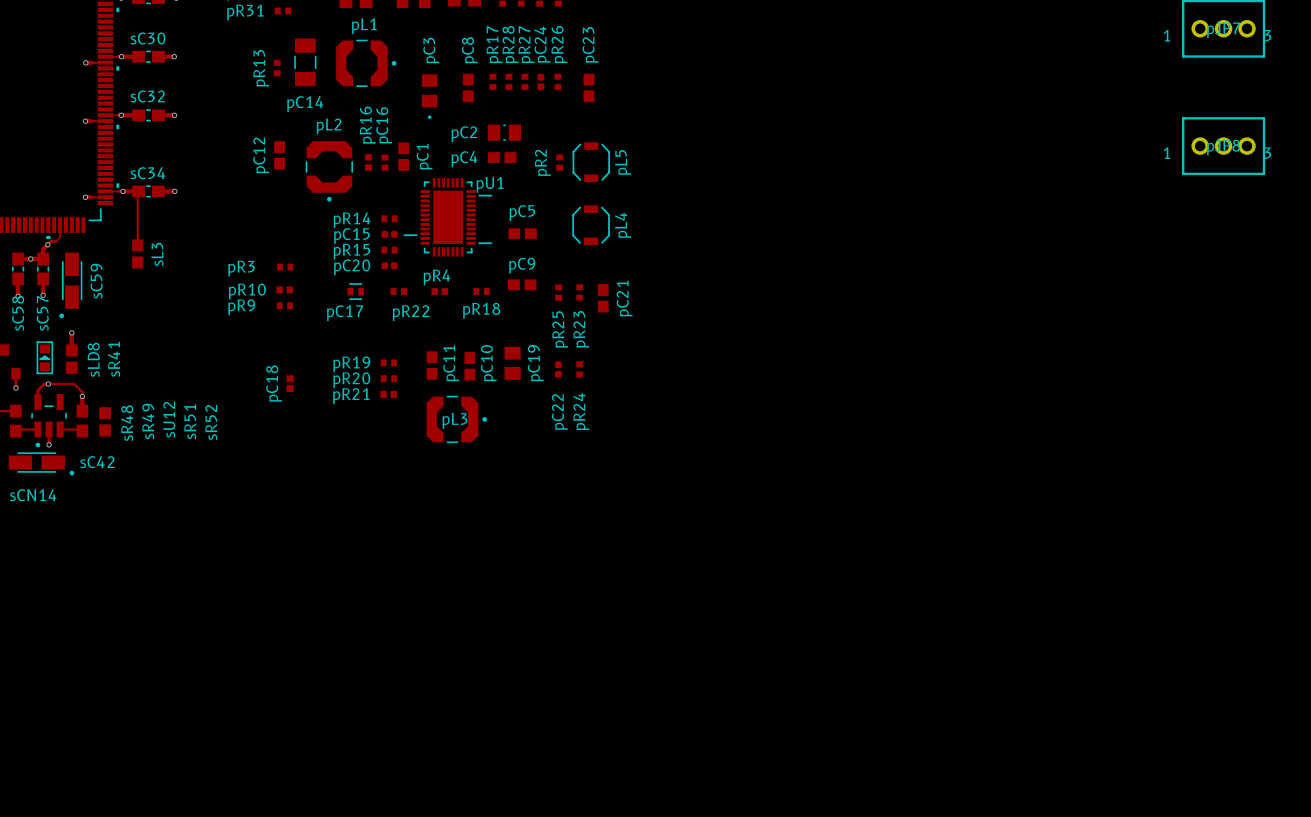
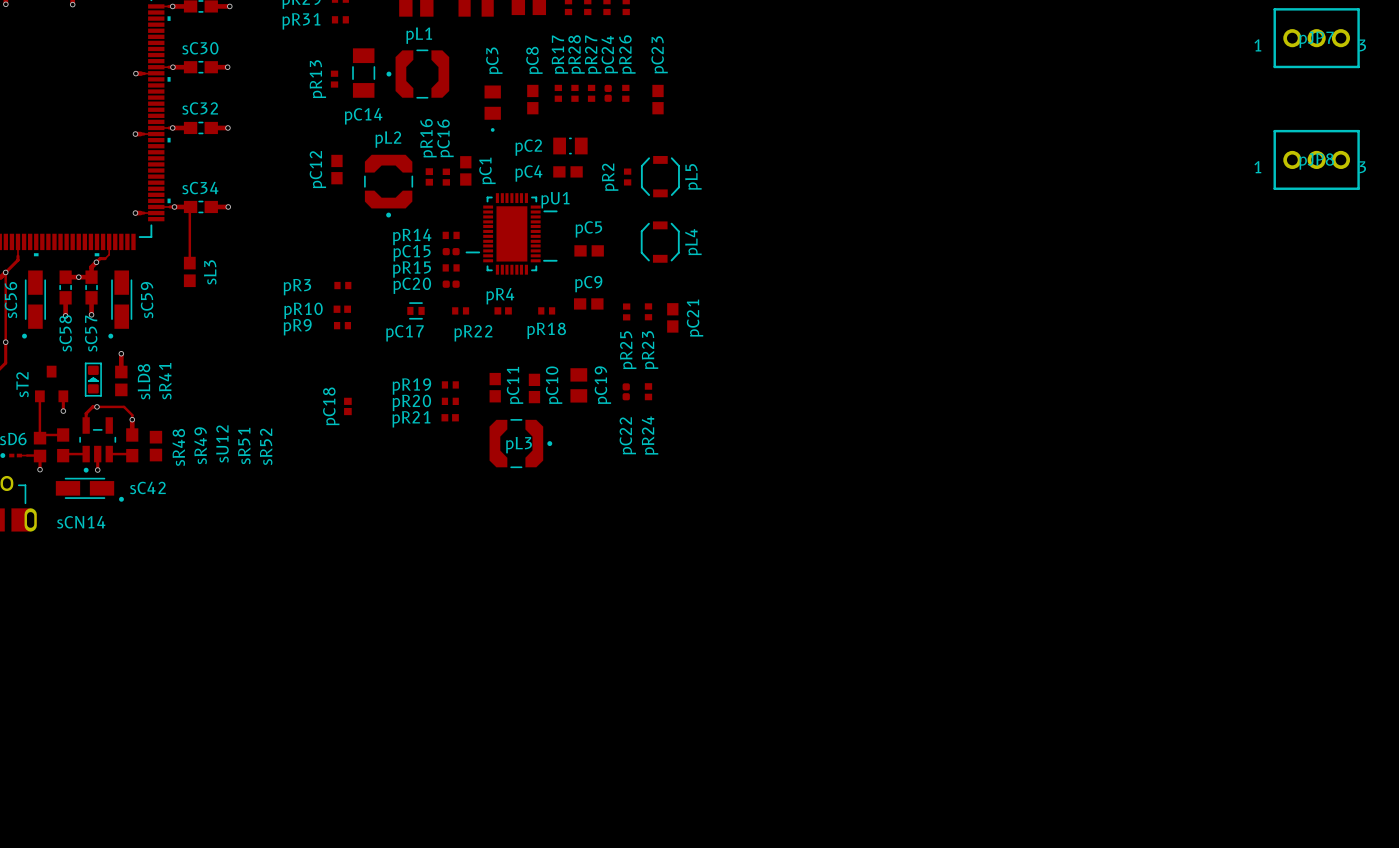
pL1 rotation: 0° (366, 63) -> 180° (417, 74)

